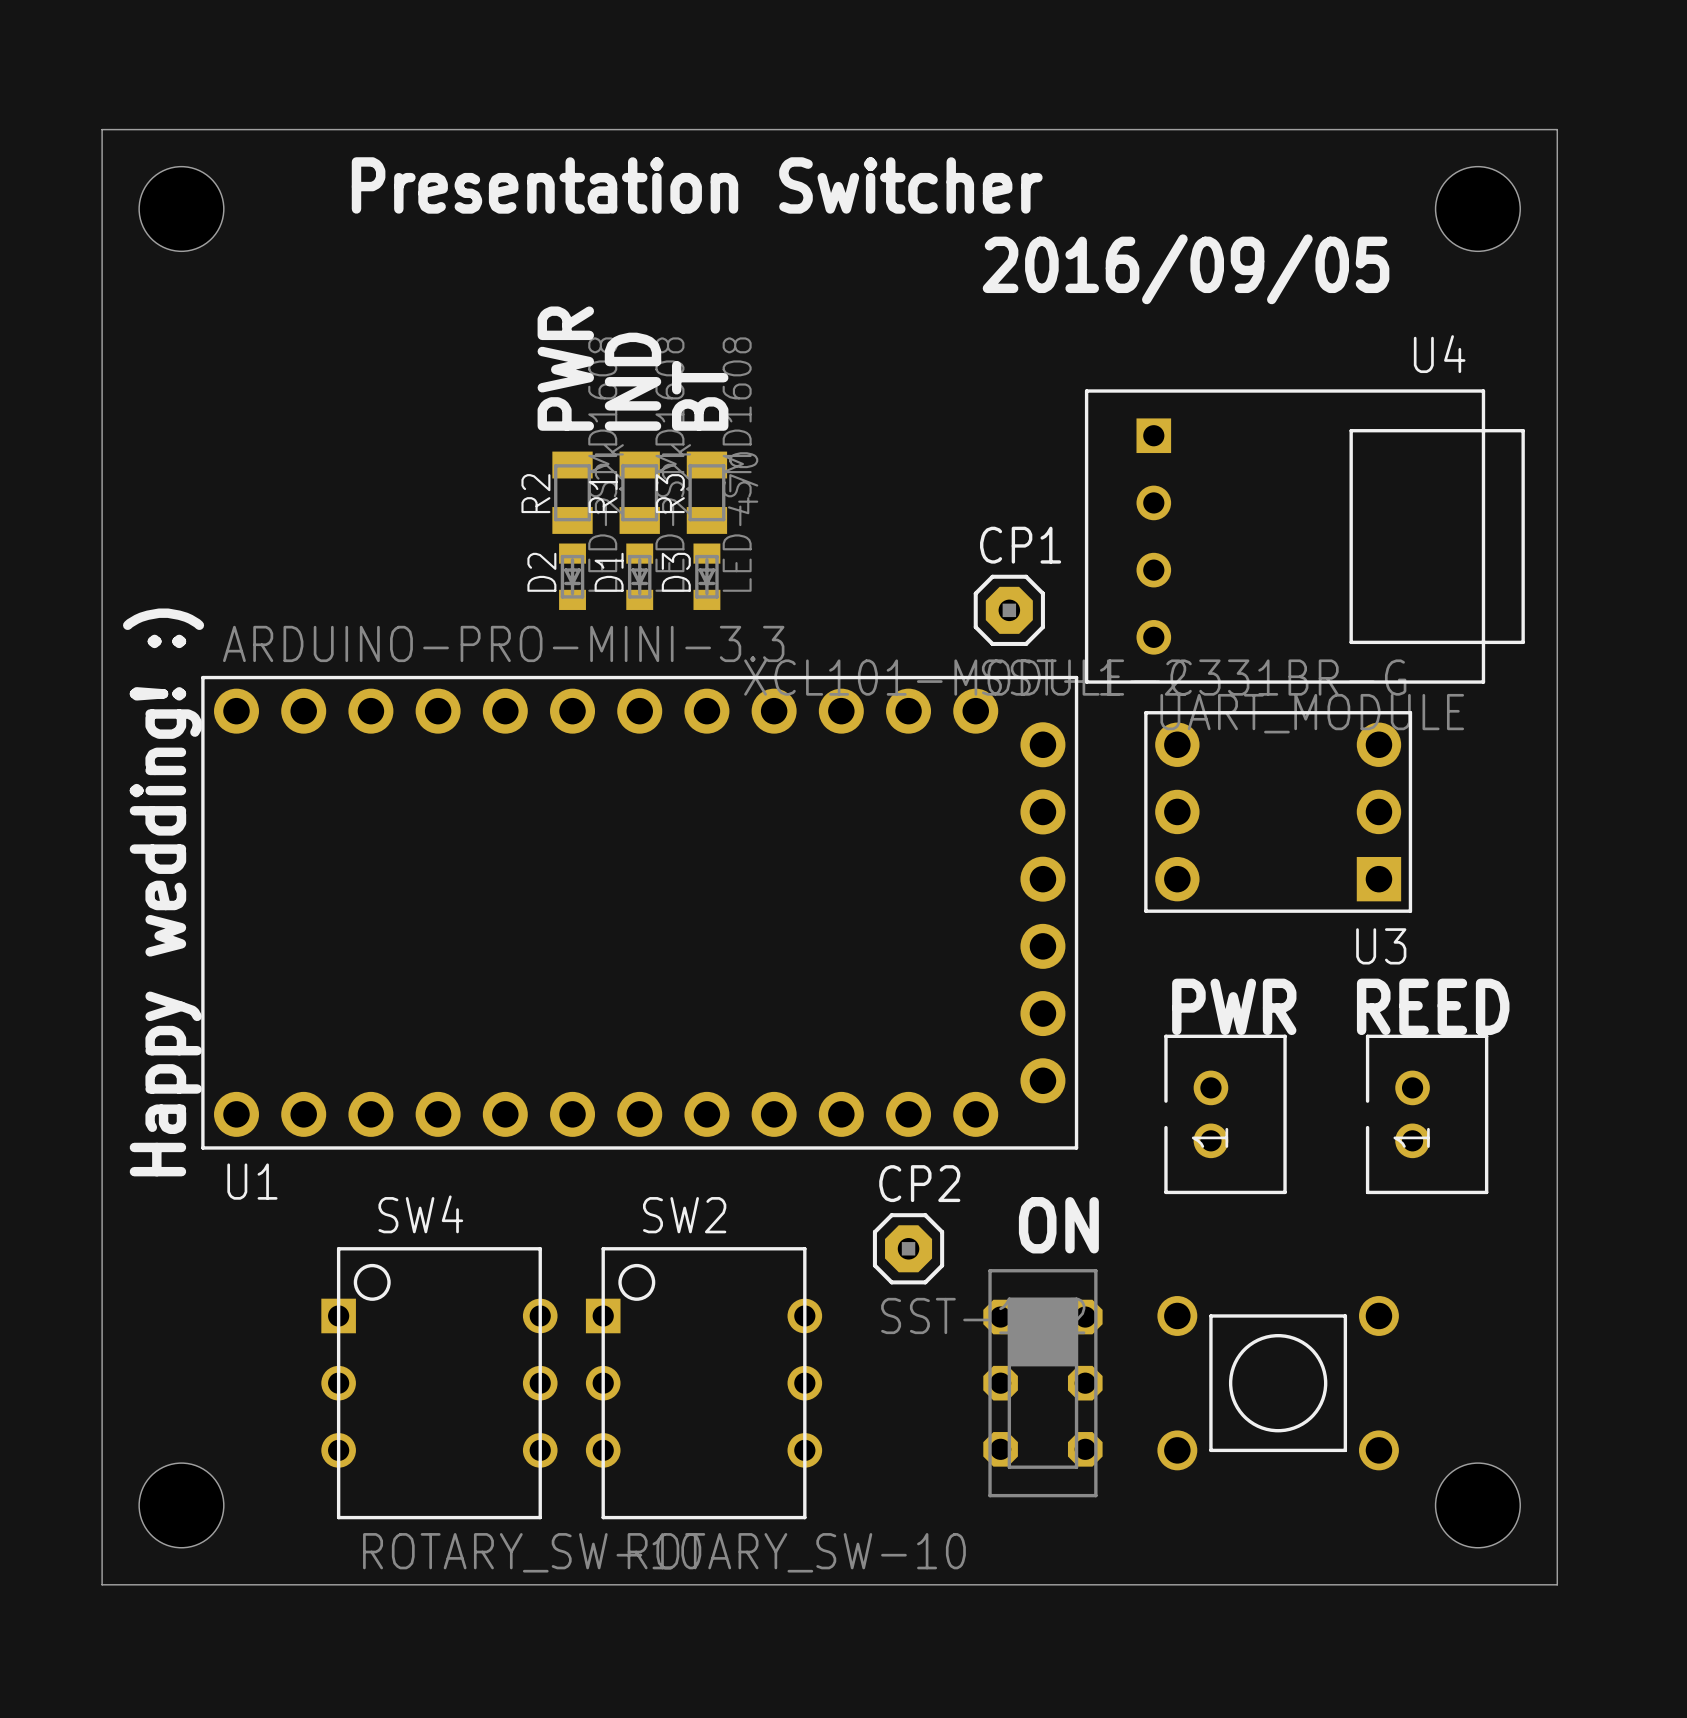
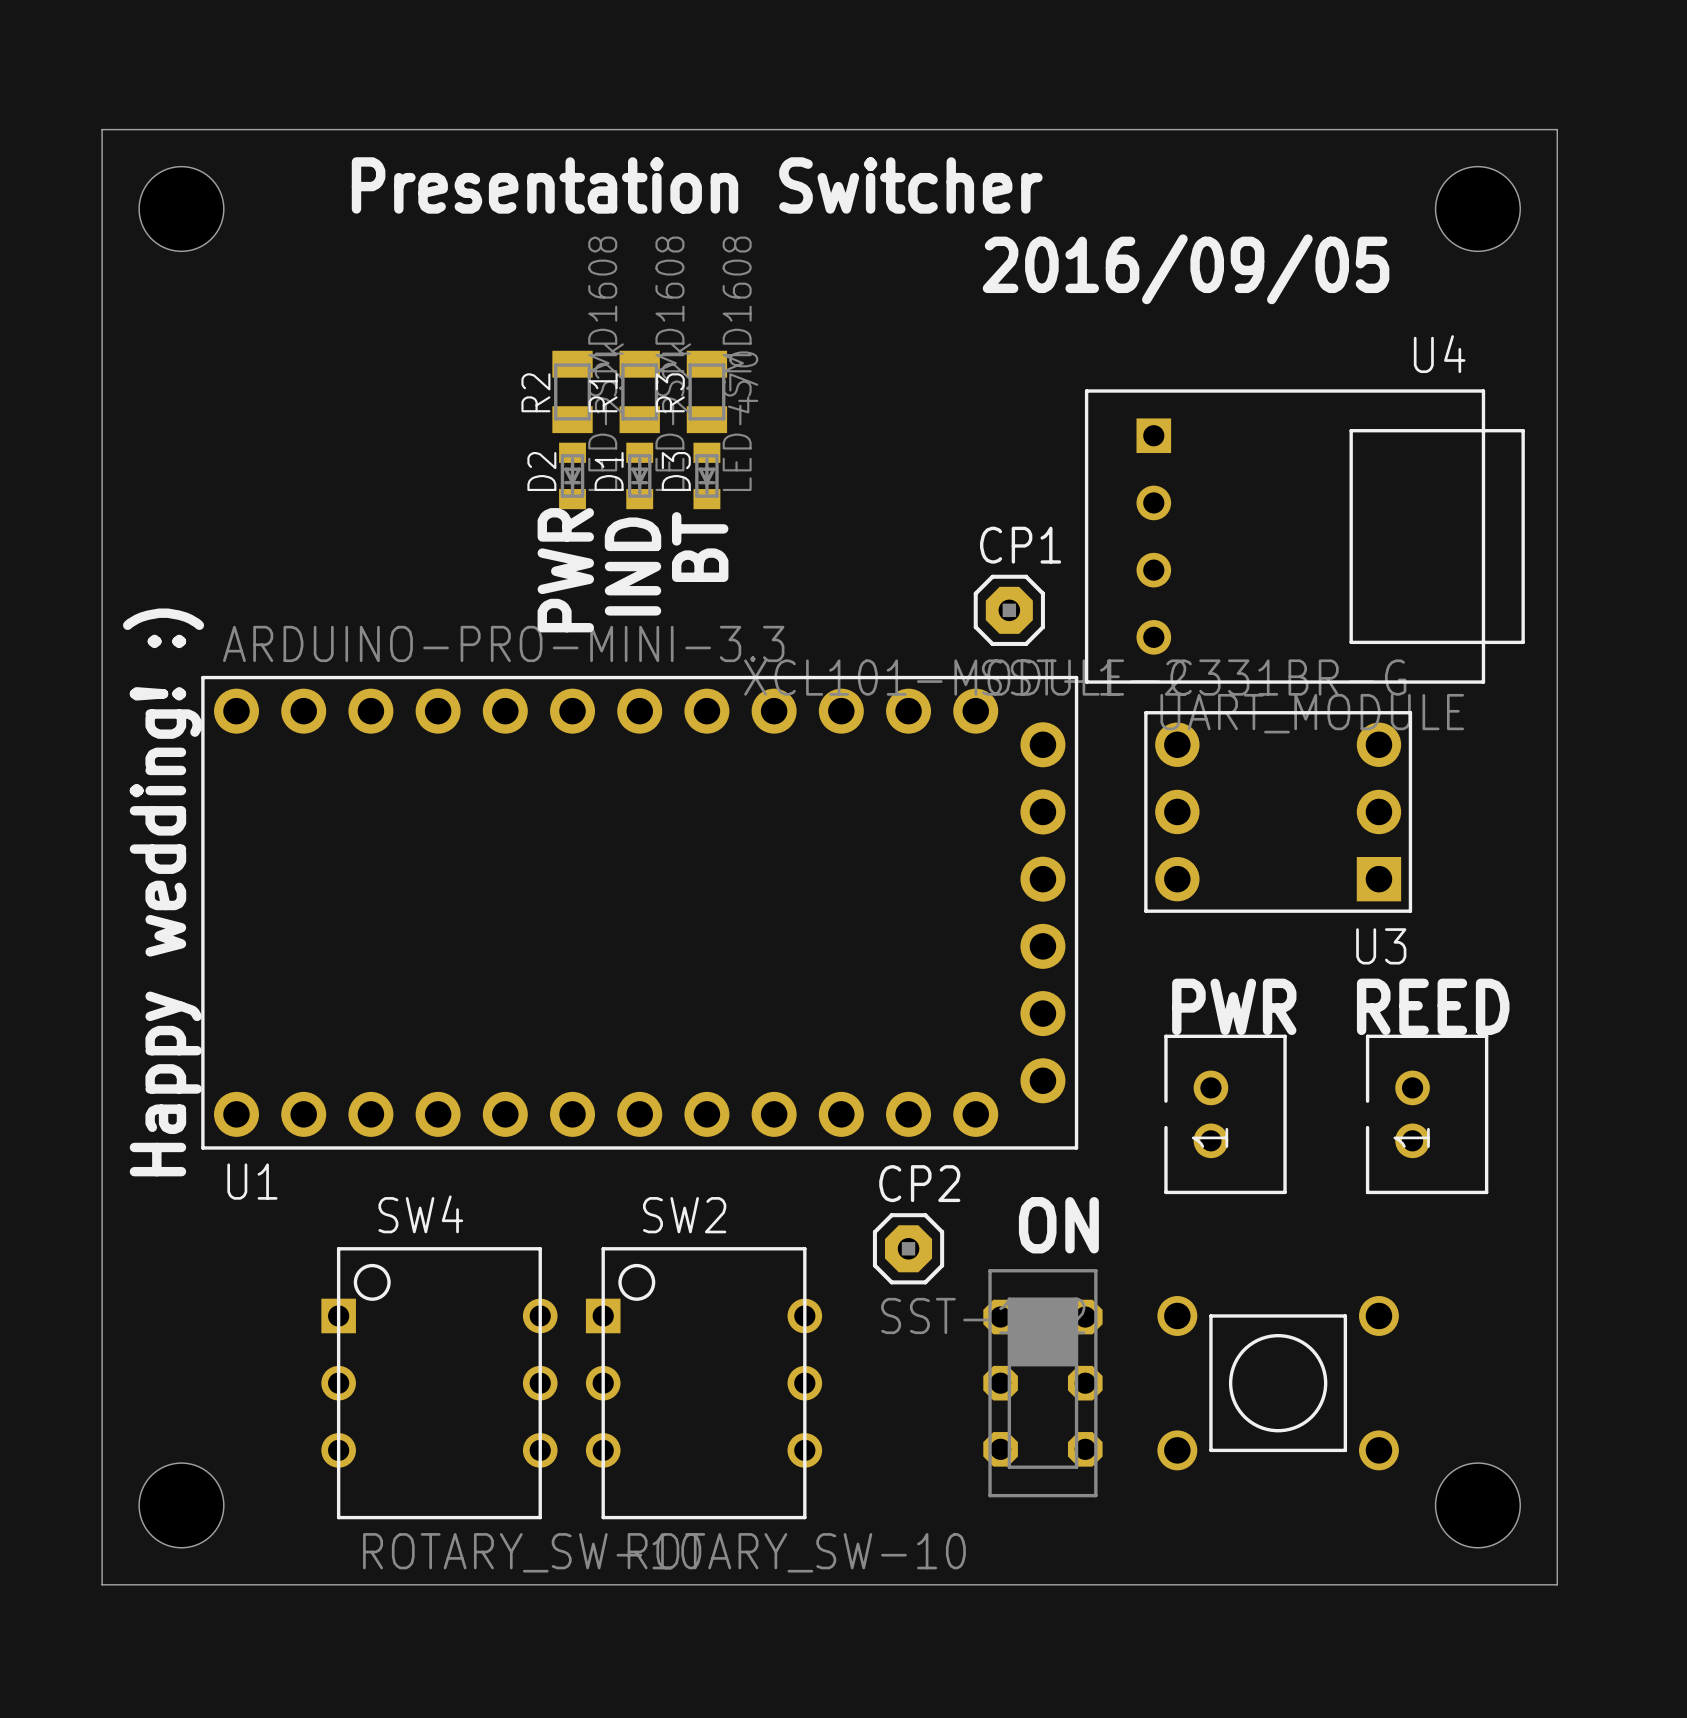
text position: PWR (565, 368) -> PWR (565, 570)
text position: IND (633, 381) -> IND (633, 566)
text position: BT (700, 395) -> BT (700, 547)
R2 position: (572, 492) -> (572, 391)
R1 position: (639, 492) -> (639, 391)
R3 position: (706, 492) -> (706, 391)
D2 position: (572, 576) -> (572, 475)
D1 position: (639, 576) -> (639, 475)
D3 position: (706, 576) -> (706, 475)

